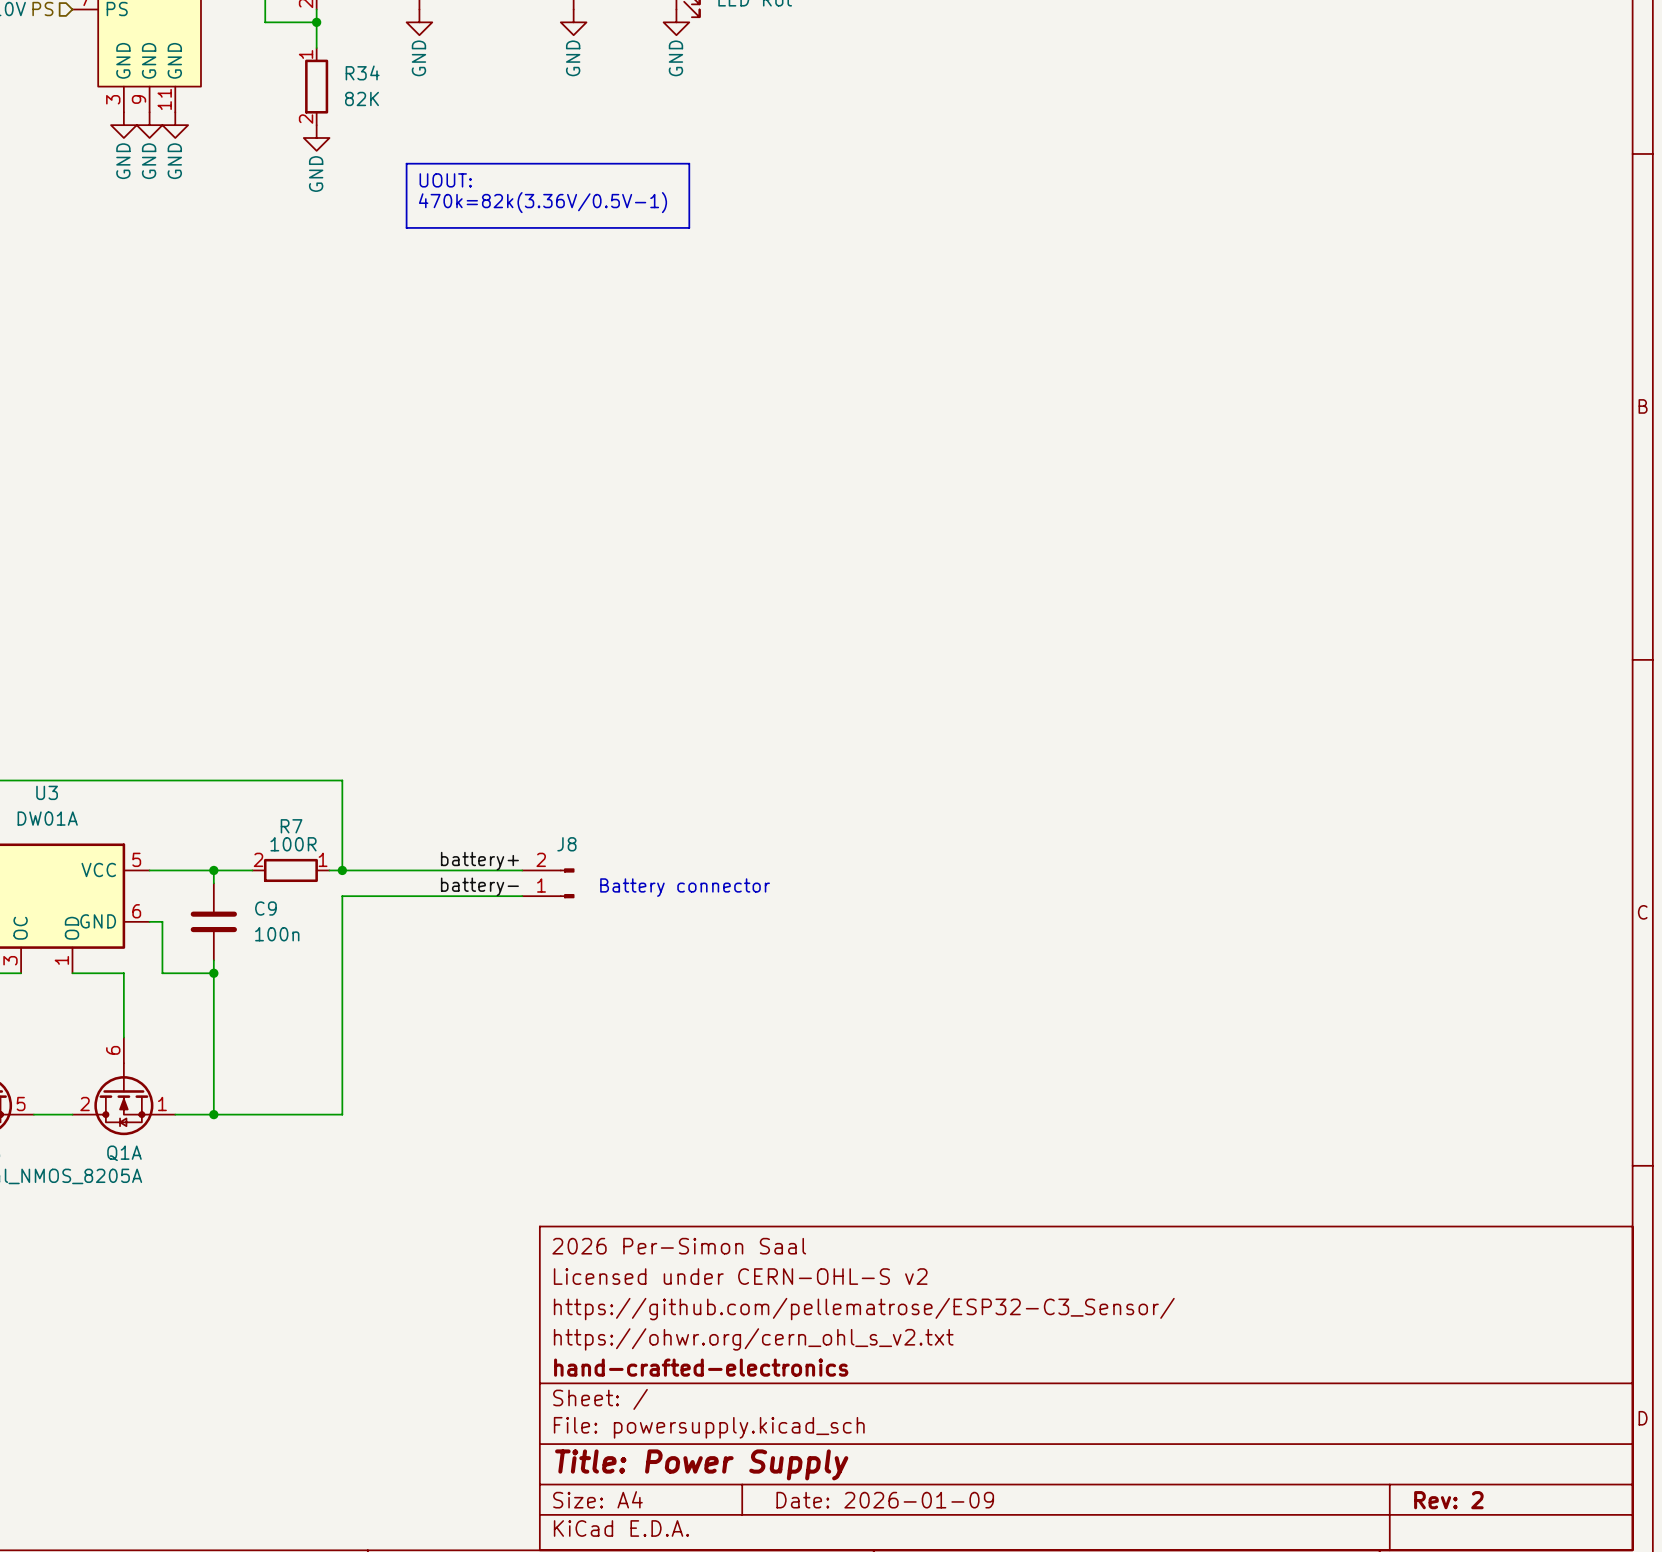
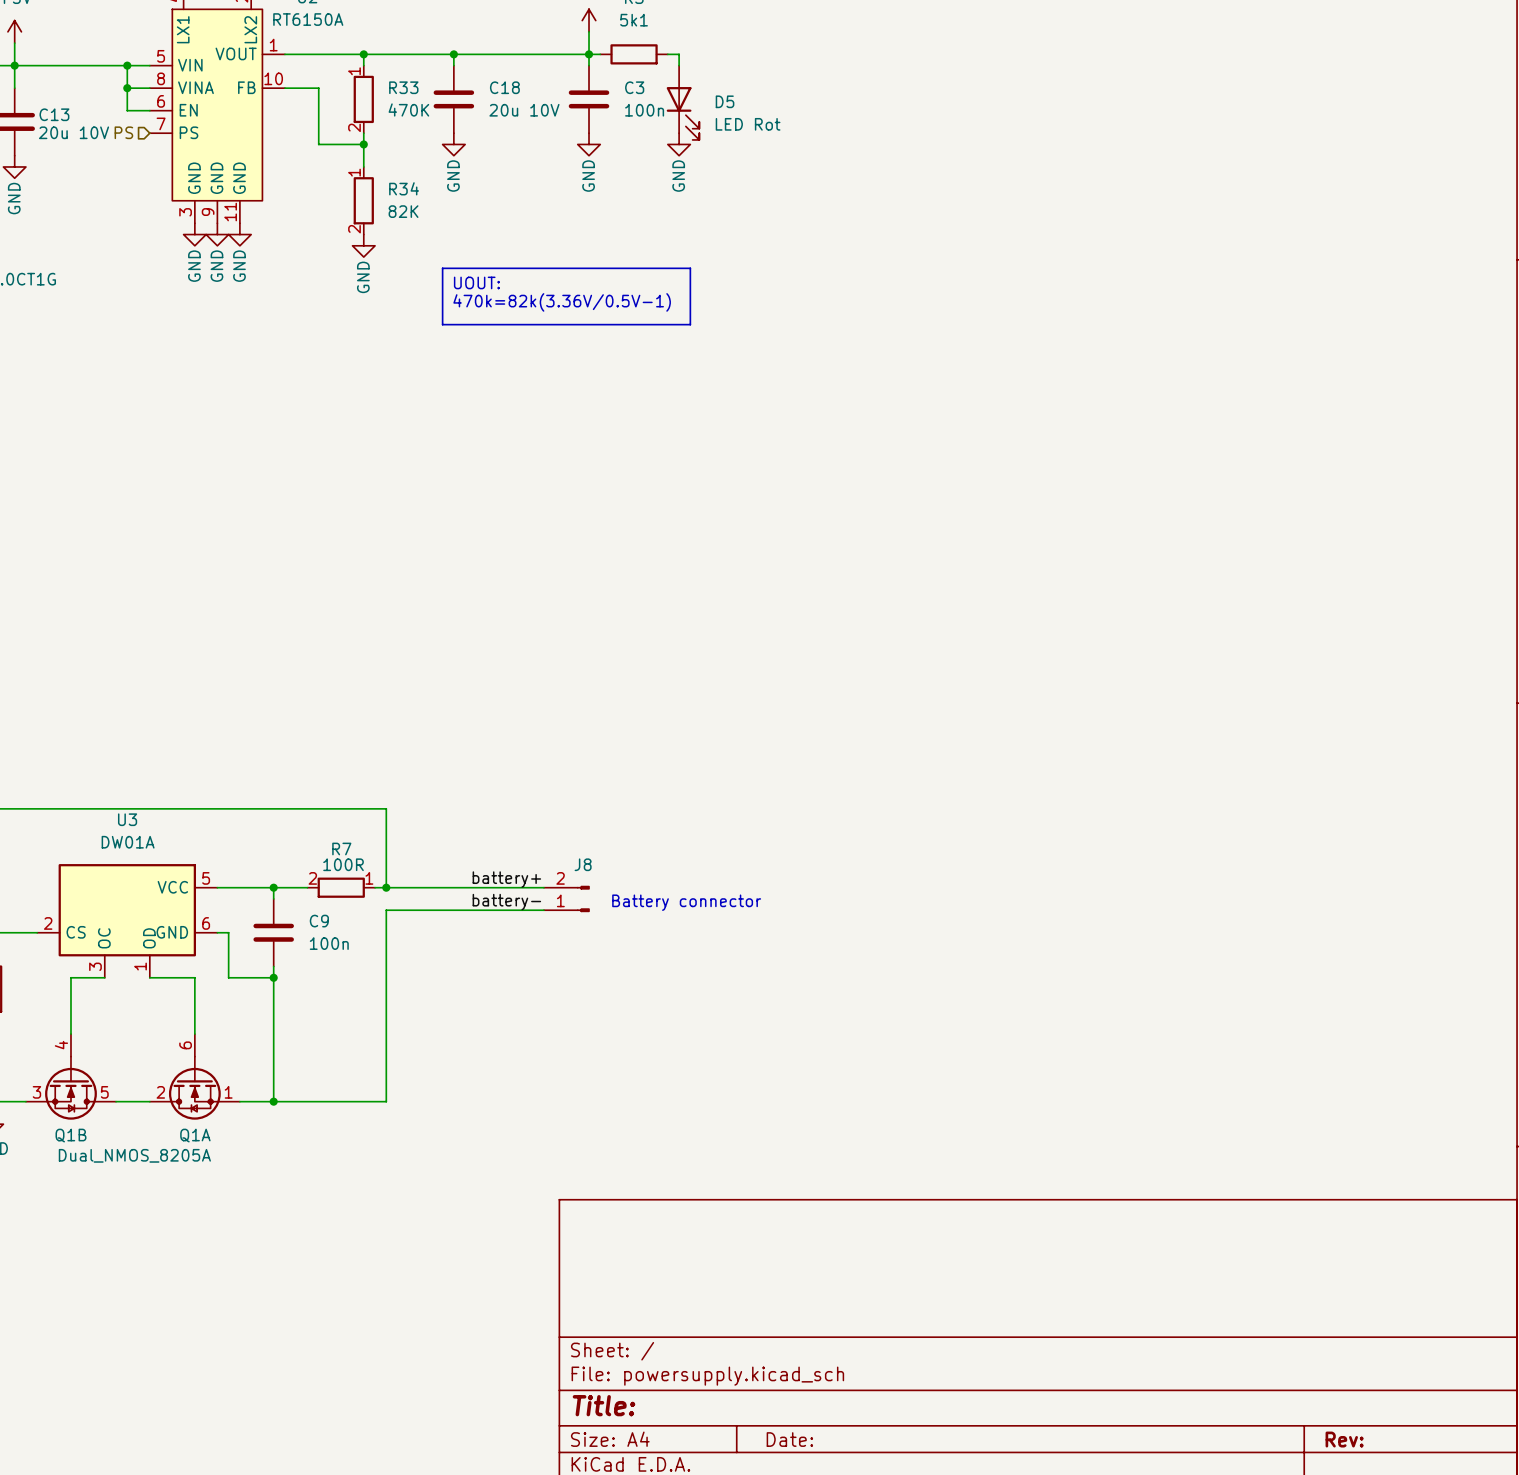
title block: 2026 Per-Simon Saal (679, 1246) -> none
title block: Licensed under CERN-OHL-S v2 (740, 1276) -> none
title block: https://github.com/pellematrose/ESP32-C3_Sensor/ (864, 1309) -> none
title block: https://ohwr.org/cern_ohl_s_v2.txt (753, 1339) -> none
title block: hand-crafted-electronics (701, 1367) -> none
title block: Title: Power Supply (701, 1464) -> Title: (604, 1405)
title block: Date: 2026-01-09 (885, 1500) -> Date: (789, 1439)
title block: Rev: 2 (1448, 1500) -> Rev: (1344, 1439)

